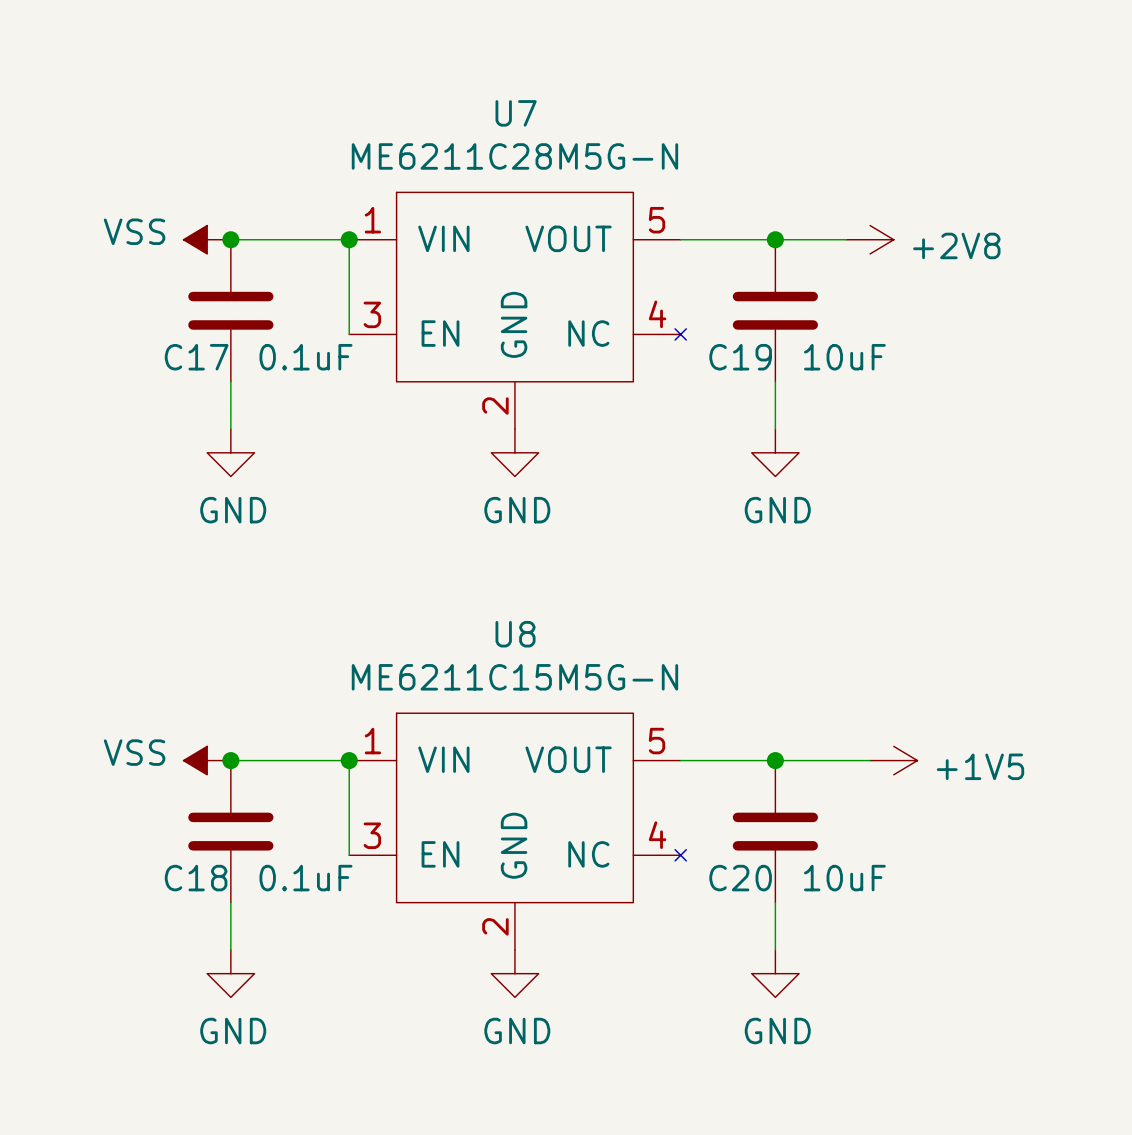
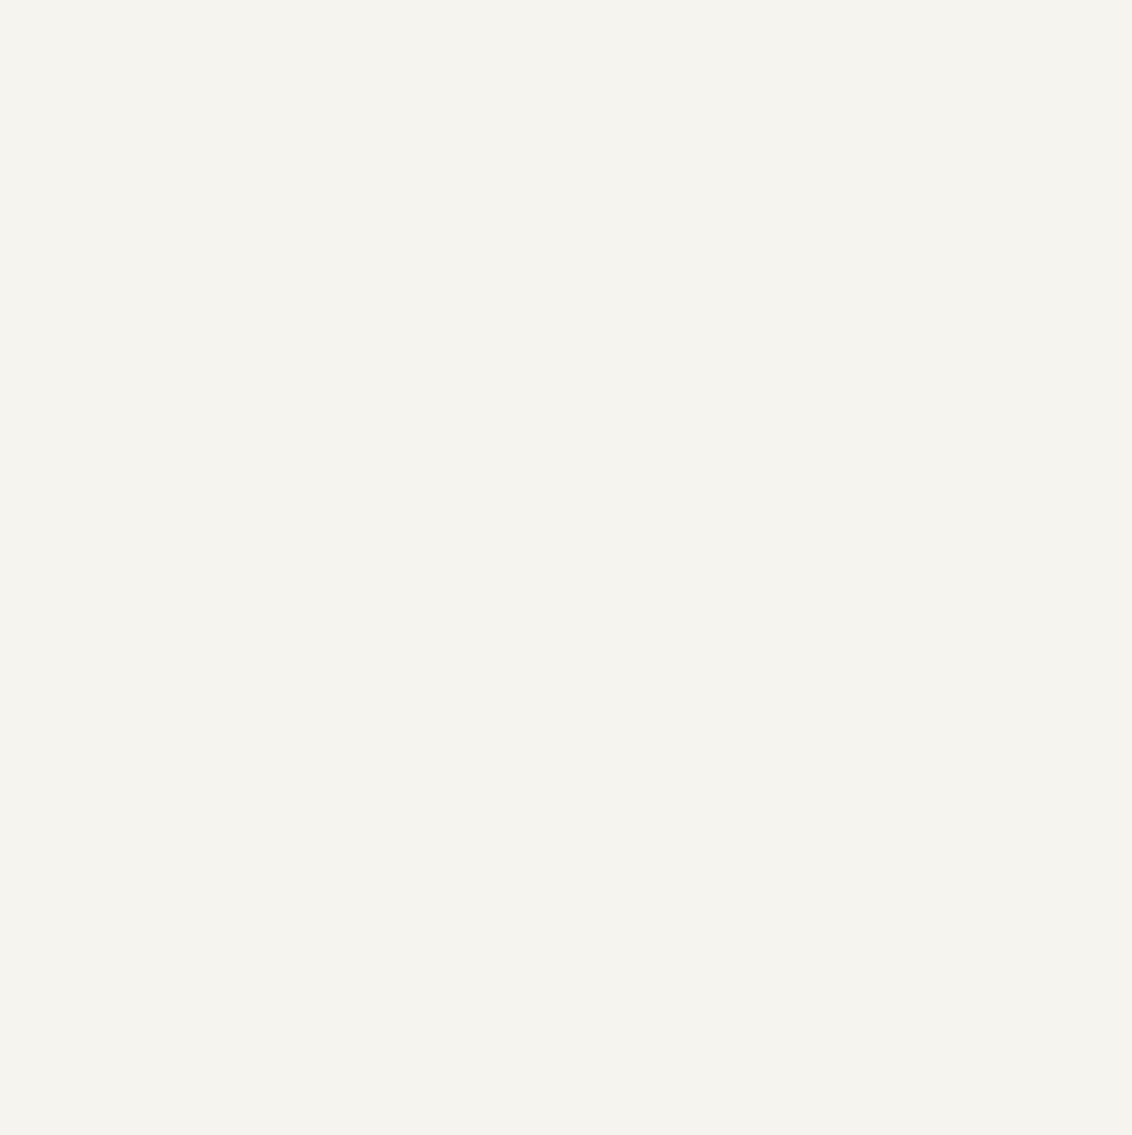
power symbol: VSS (207, 239) -> none
wire: (230, 239) (349, 239) (349, 334) -> none
junction: (230, 239) -> none
junction: (349, 239) -> none
wire: (680, 239) (846, 239) -> none
junction: (775, 239) -> none
power symbol: +2V8 (870, 239) -> none
C17: 0.1uF (230, 310) -> none
U7: ME6211C28M5G-N (517, 310) -> none
C19: 10uF (775, 310) -> none
wire: (230, 381) (230, 429) -> none
wire: (775, 381) (775, 429) -> none
power symbol: GND (230, 452) -> none
power symbol: GND (514, 452) -> none
power symbol: GND (775, 452) -> none
power symbol: VSS (207, 760) -> none
wire: (230, 760) (349, 760) (349, 855) -> none
junction: (230, 760) -> none
junction: (349, 760) -> none
wire: (680, 760) (870, 760) -> none
junction: (775, 760) -> none
power symbol: +1V5 (893, 760) -> none
C18: 0.1uF (230, 831) -> none
U8: ME6211C15M5G-N (517, 831) -> none
C20: 10uF (775, 831) -> none
wire: (230, 902) (230, 949) -> none
wire: (775, 902) (775, 949) -> none
power symbol: GND (230, 973) -> none
power symbol: GND (514, 973) -> none
power symbol: GND (775, 973) -> none

